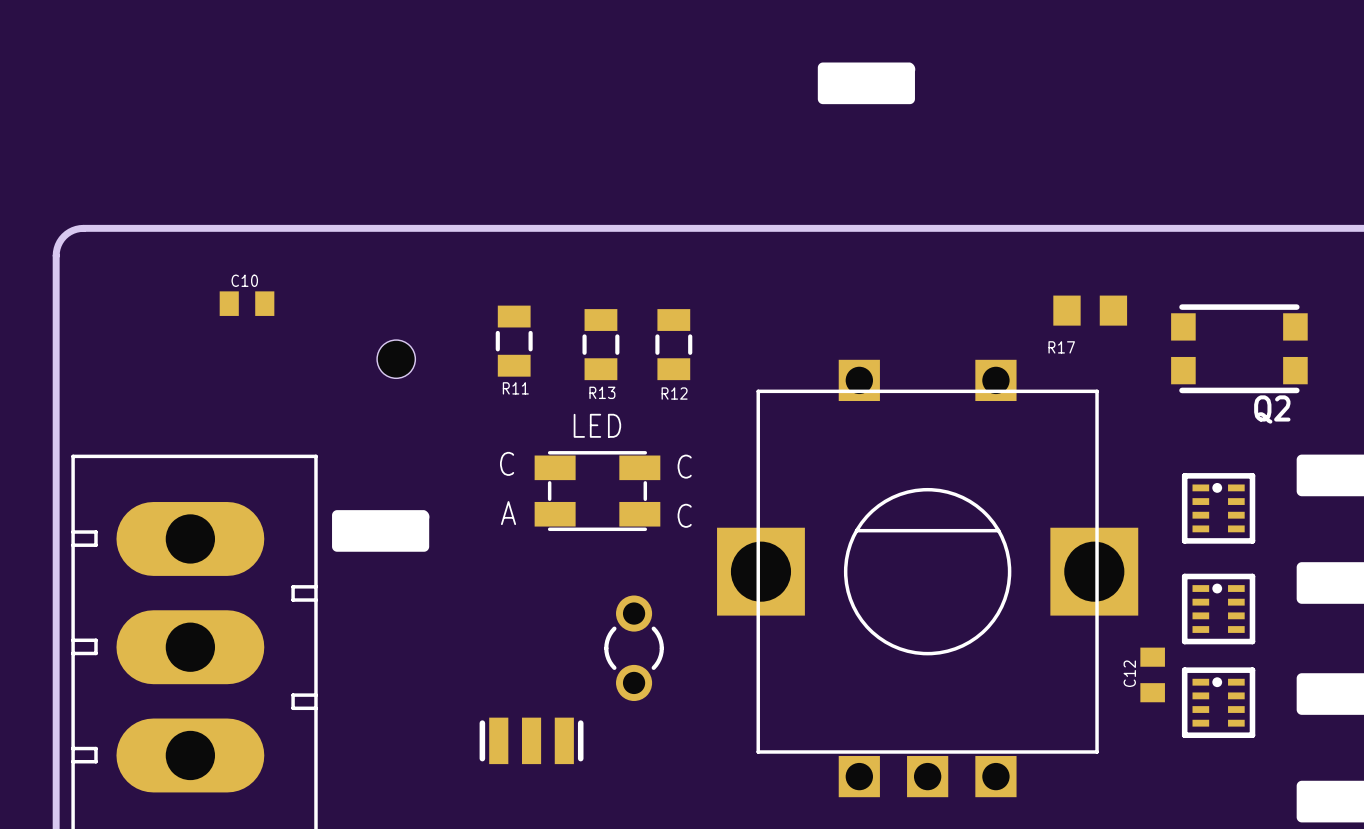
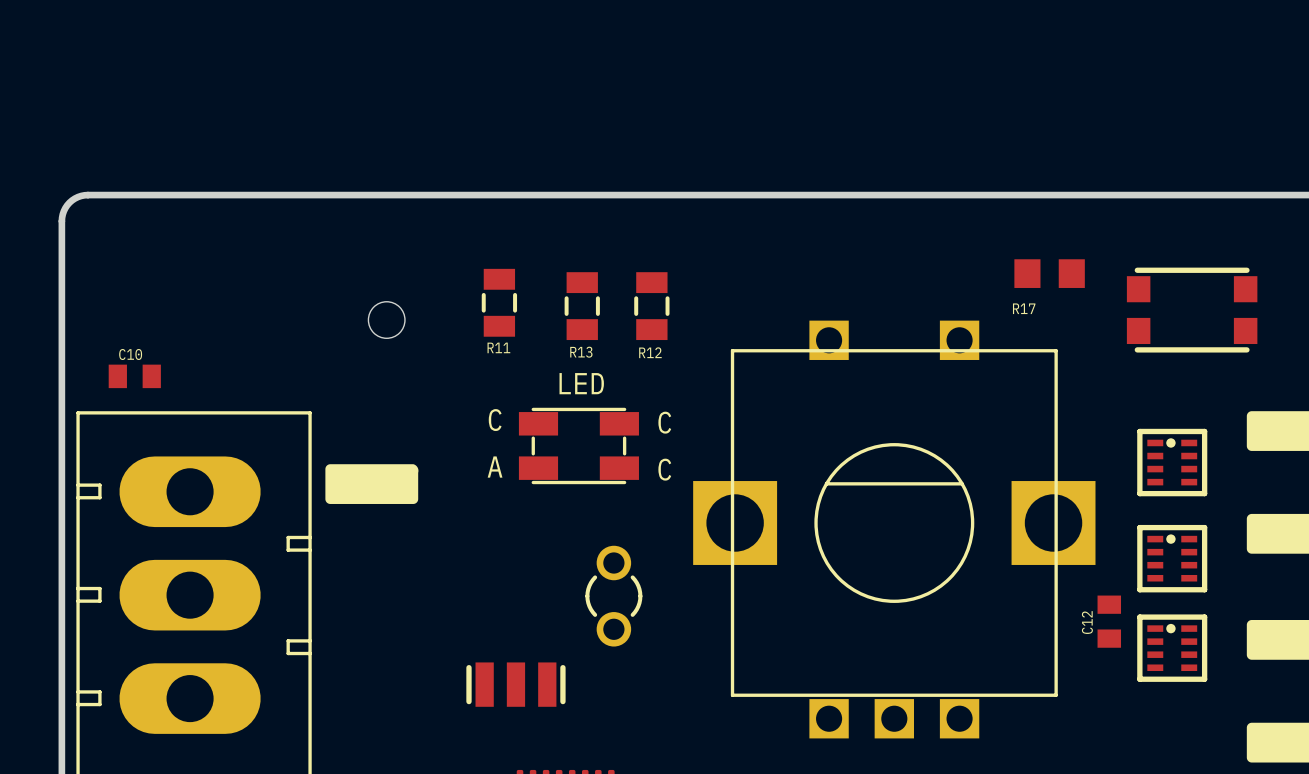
drawing: [817, 62, 916, 105] -> none
C10 position: (247, 303) -> (134, 376)
Q2 name: Q2 (1272, 409) -> none

